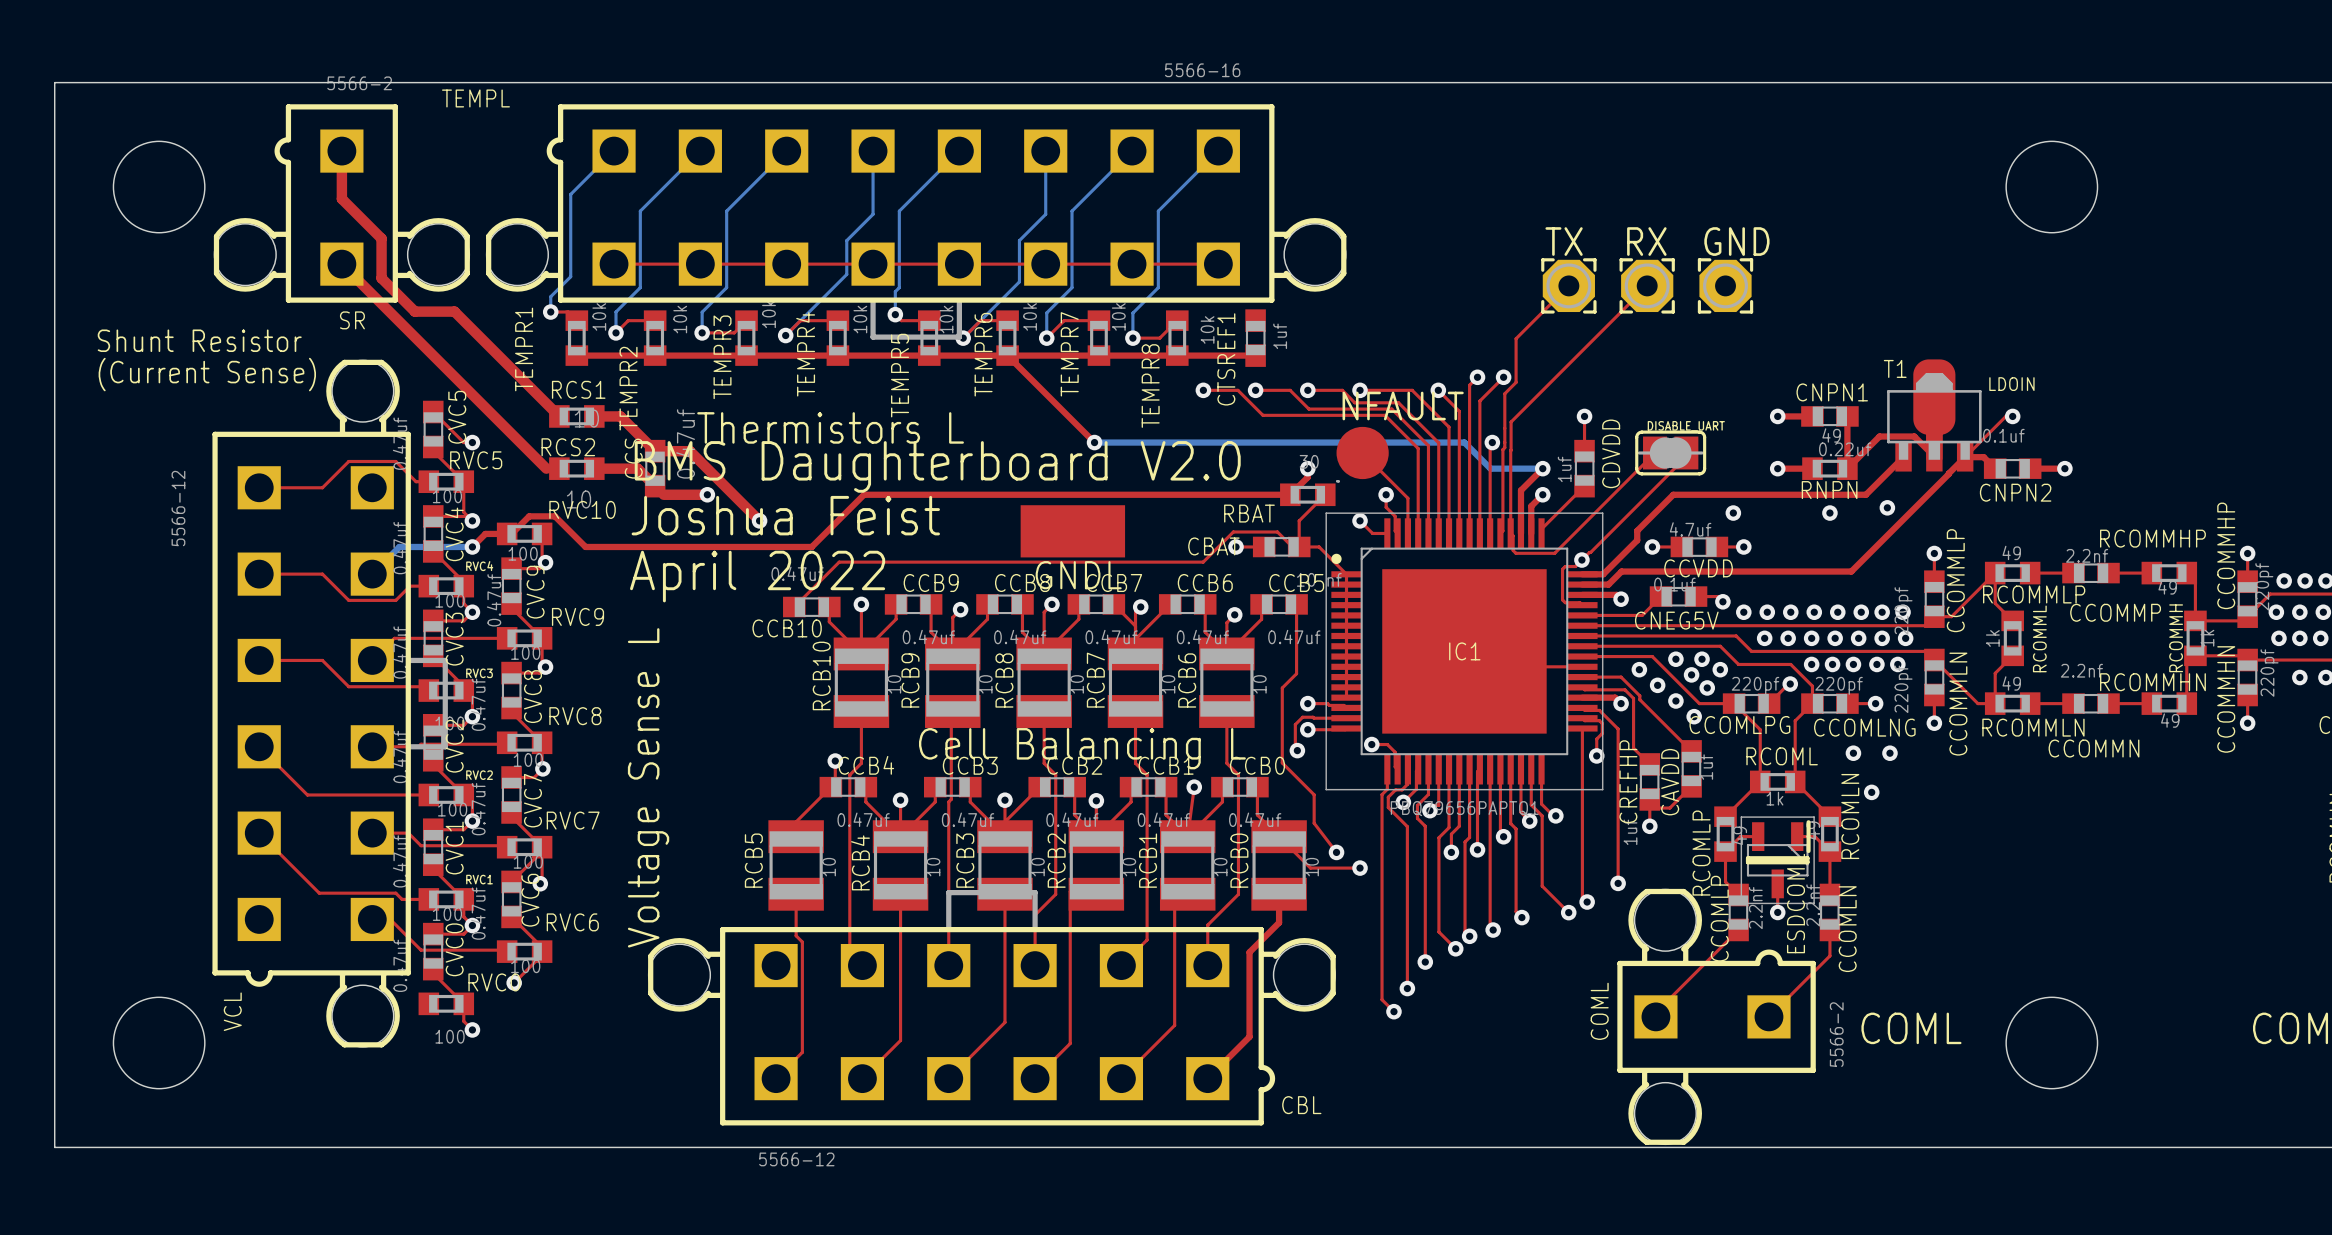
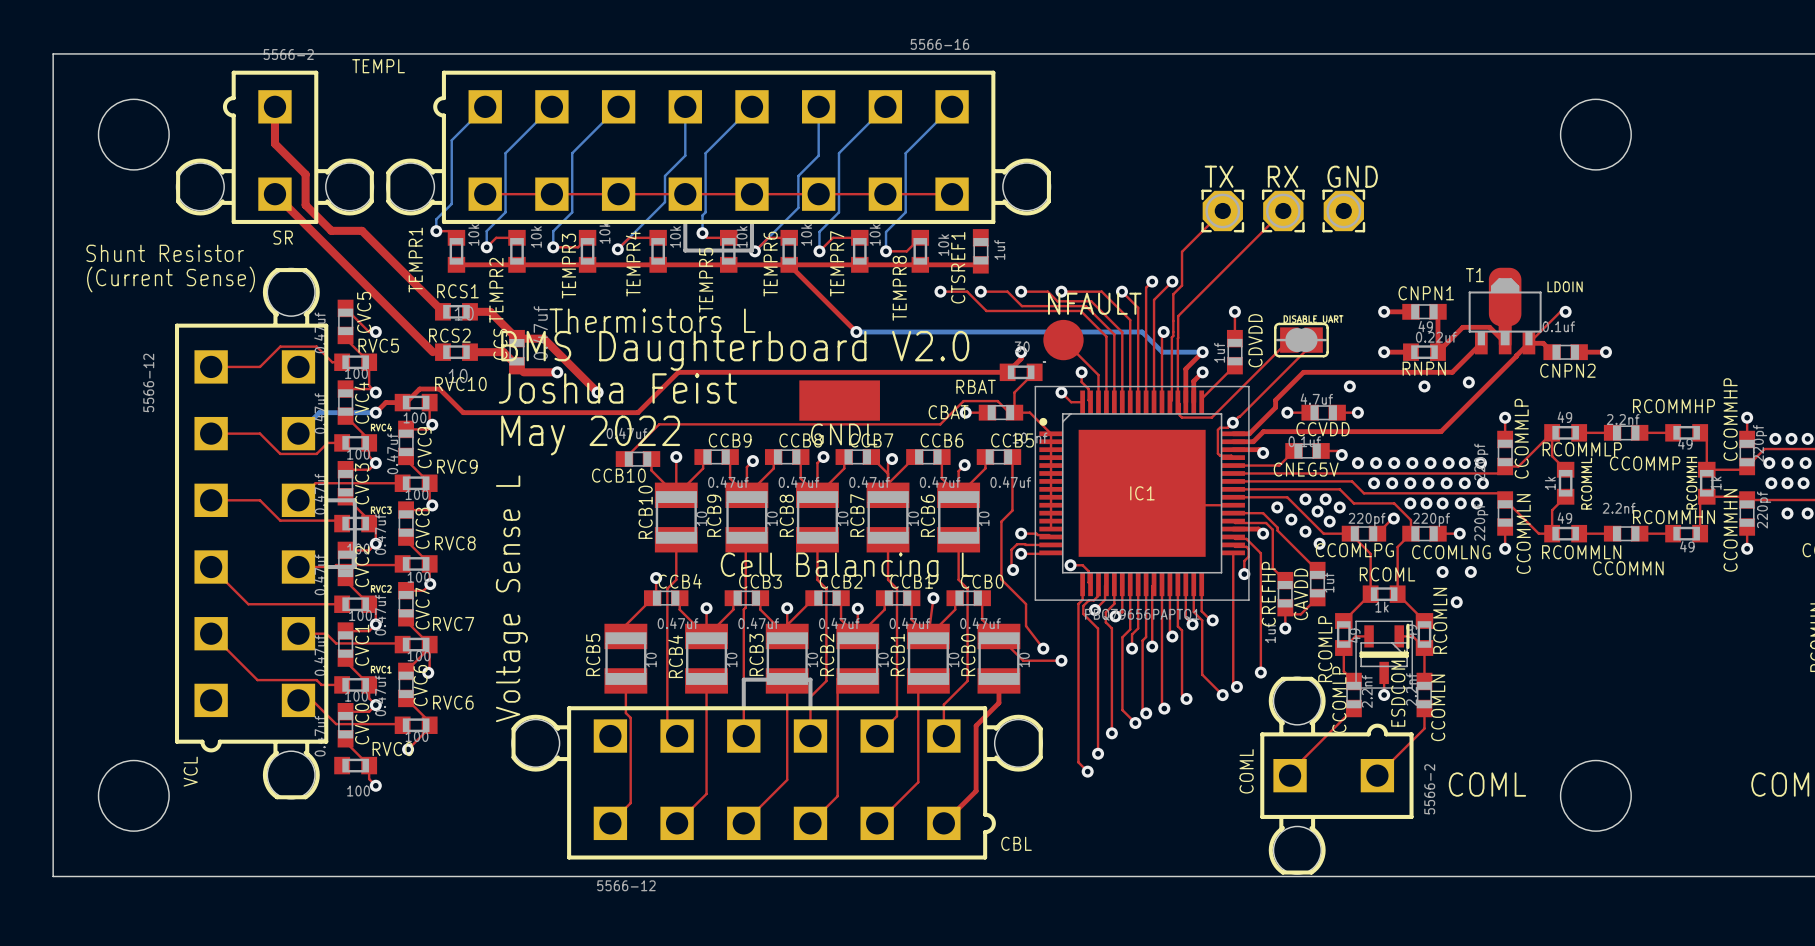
text: April 2022 (757, 576) -> May 2022 (590, 435)

